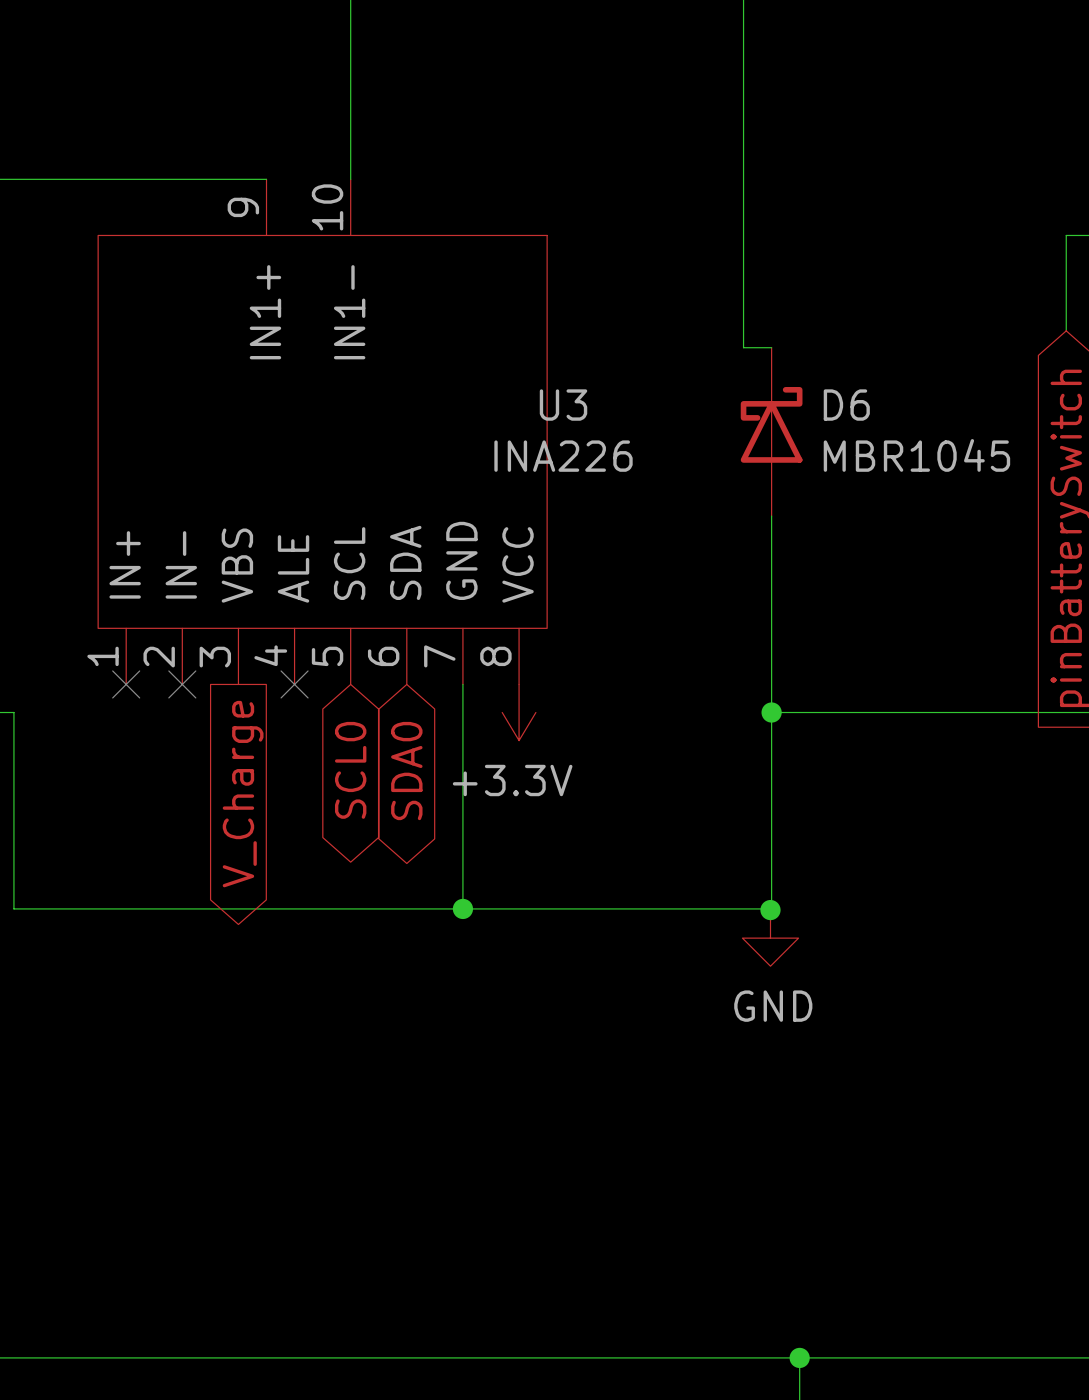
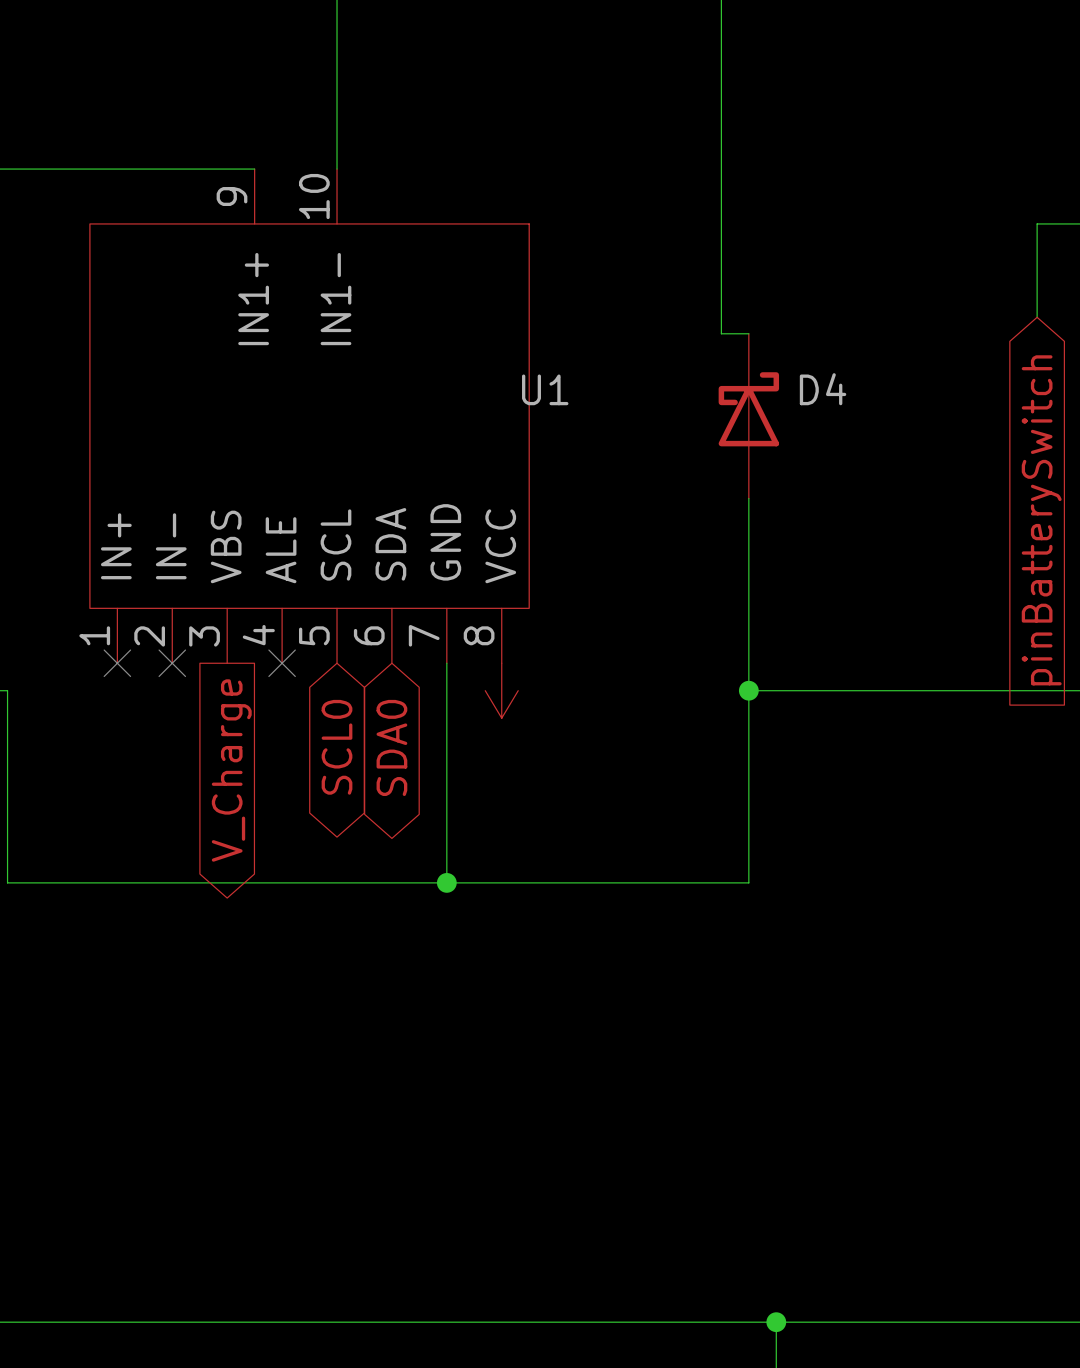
U3 name: U3 (563, 405) -> U1 (545, 389)
D6 name: D6 (846, 405) -> D4 (823, 389)
D6 value: MBR1045 (916, 455) -> none
U3 value: INA226 (563, 456) -> none
power symbol text: +3.3V (512, 780) -> none
junction: (770, 910) -> none
power symbol: GND (770, 938) -> none

